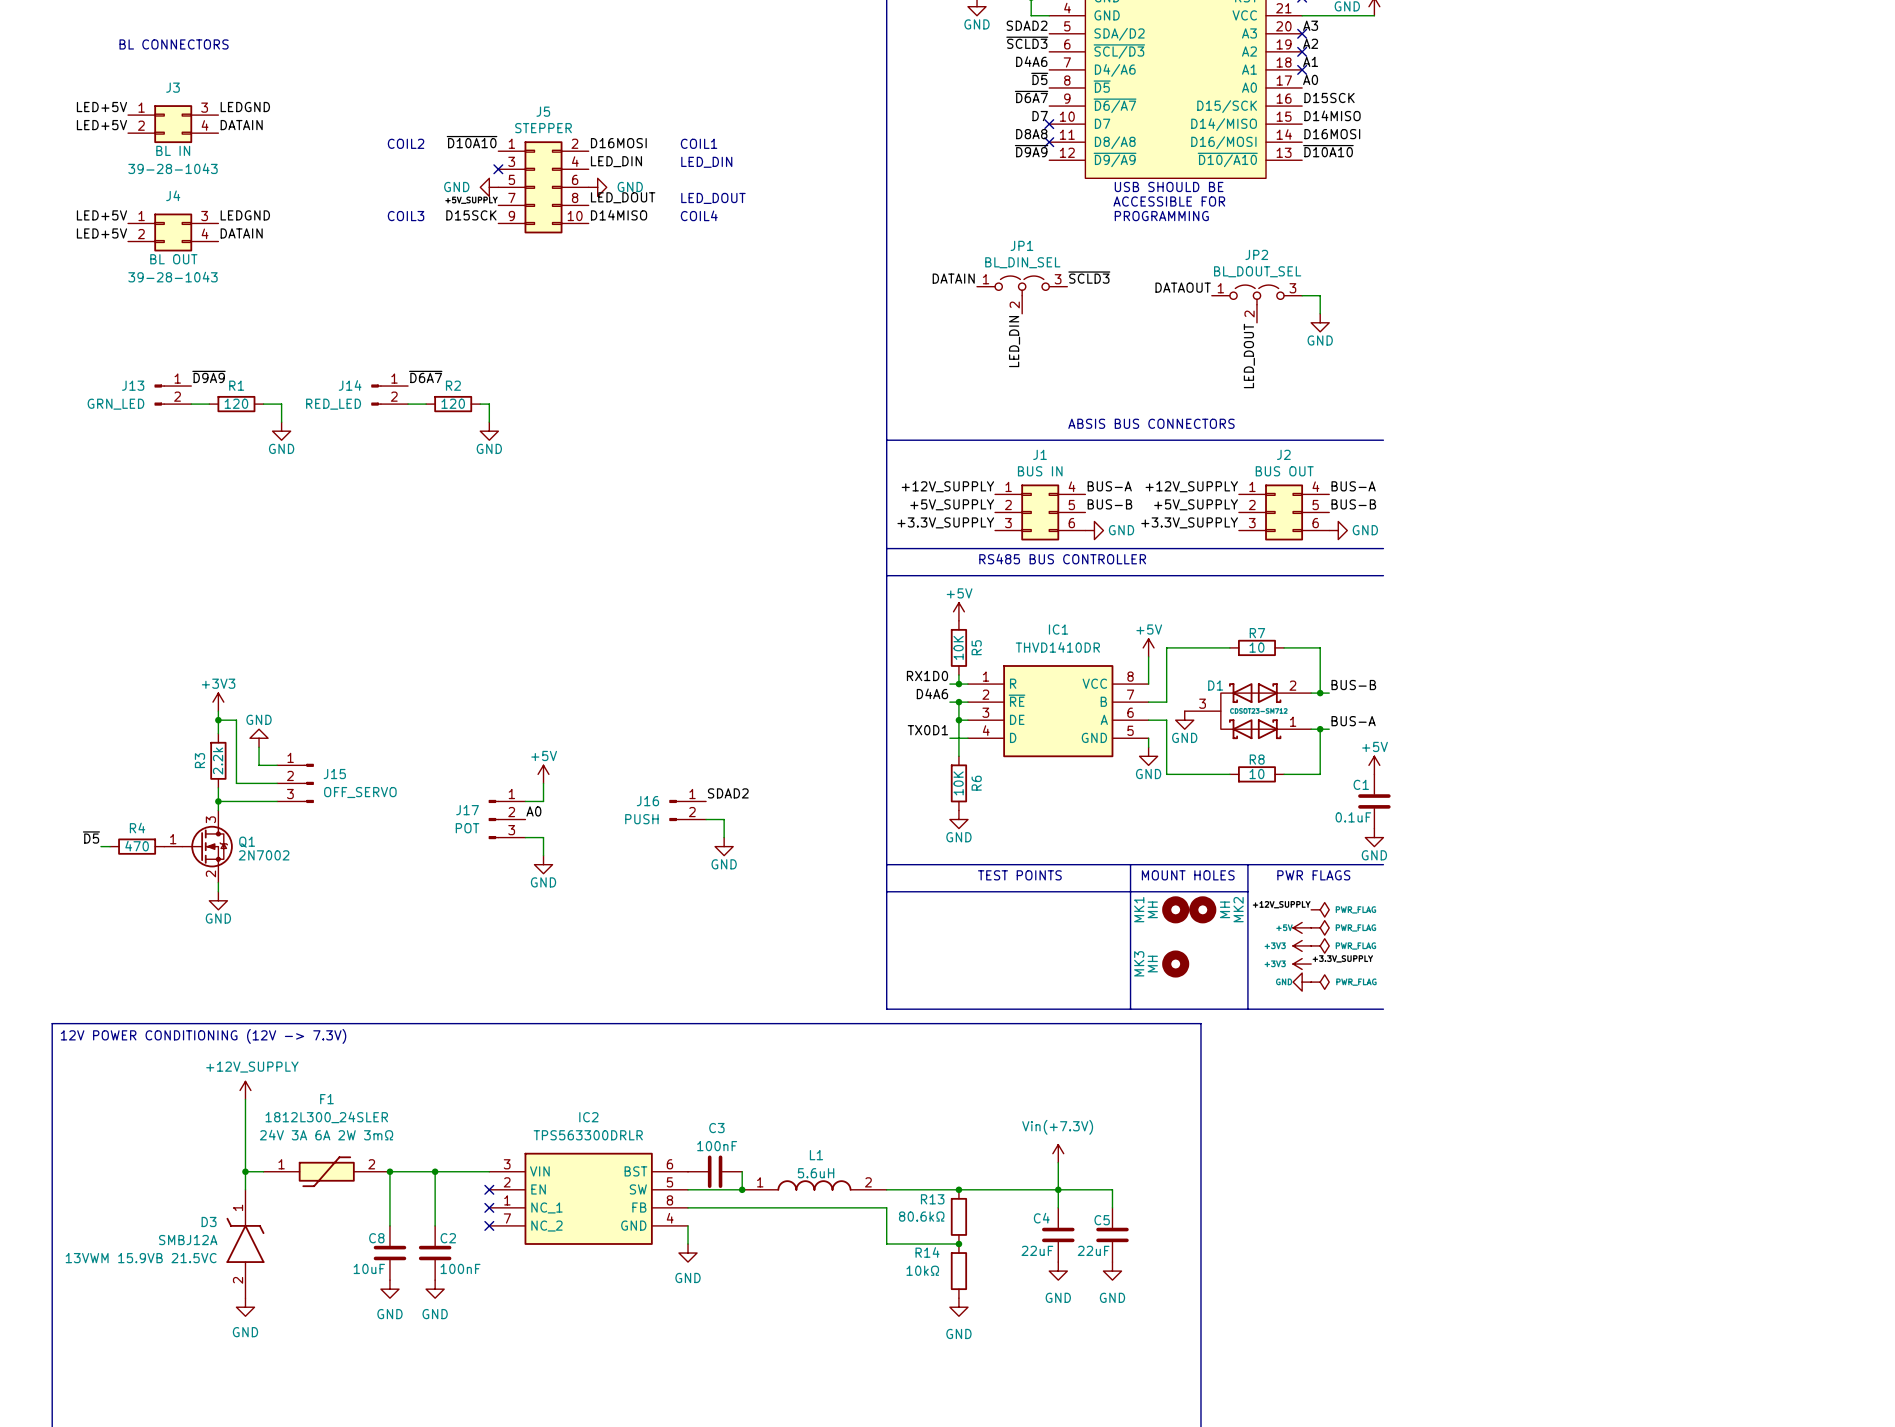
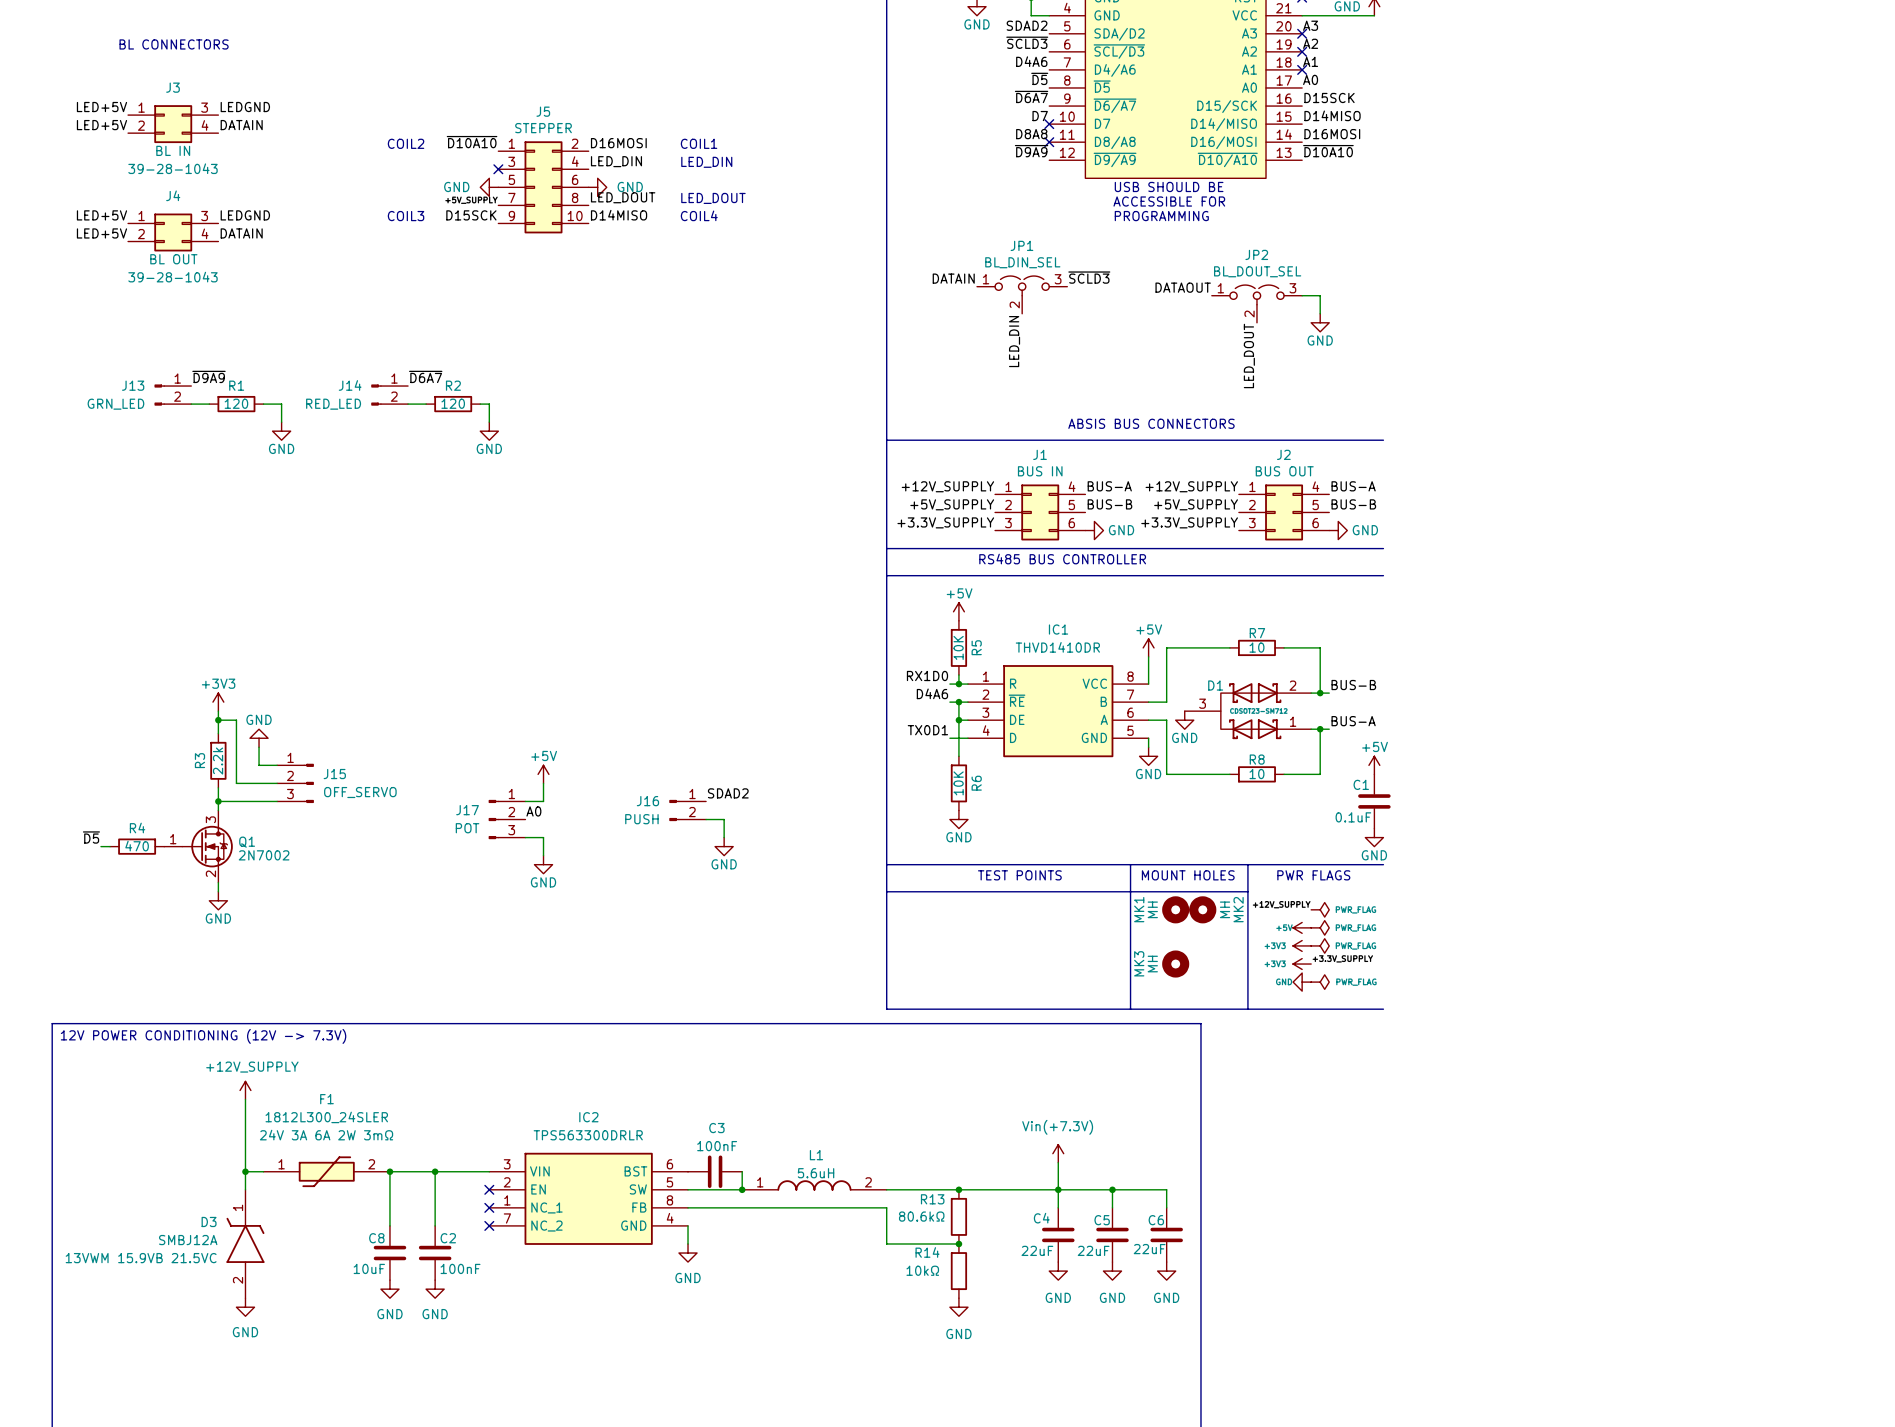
wire: none -> (1112, 1189) (1166, 1189) (1166, 1207)
junction: none -> (1112, 1189)
C6: none -> 22uF (1166, 1234)
power symbol: none -> GND (1166, 1271)

